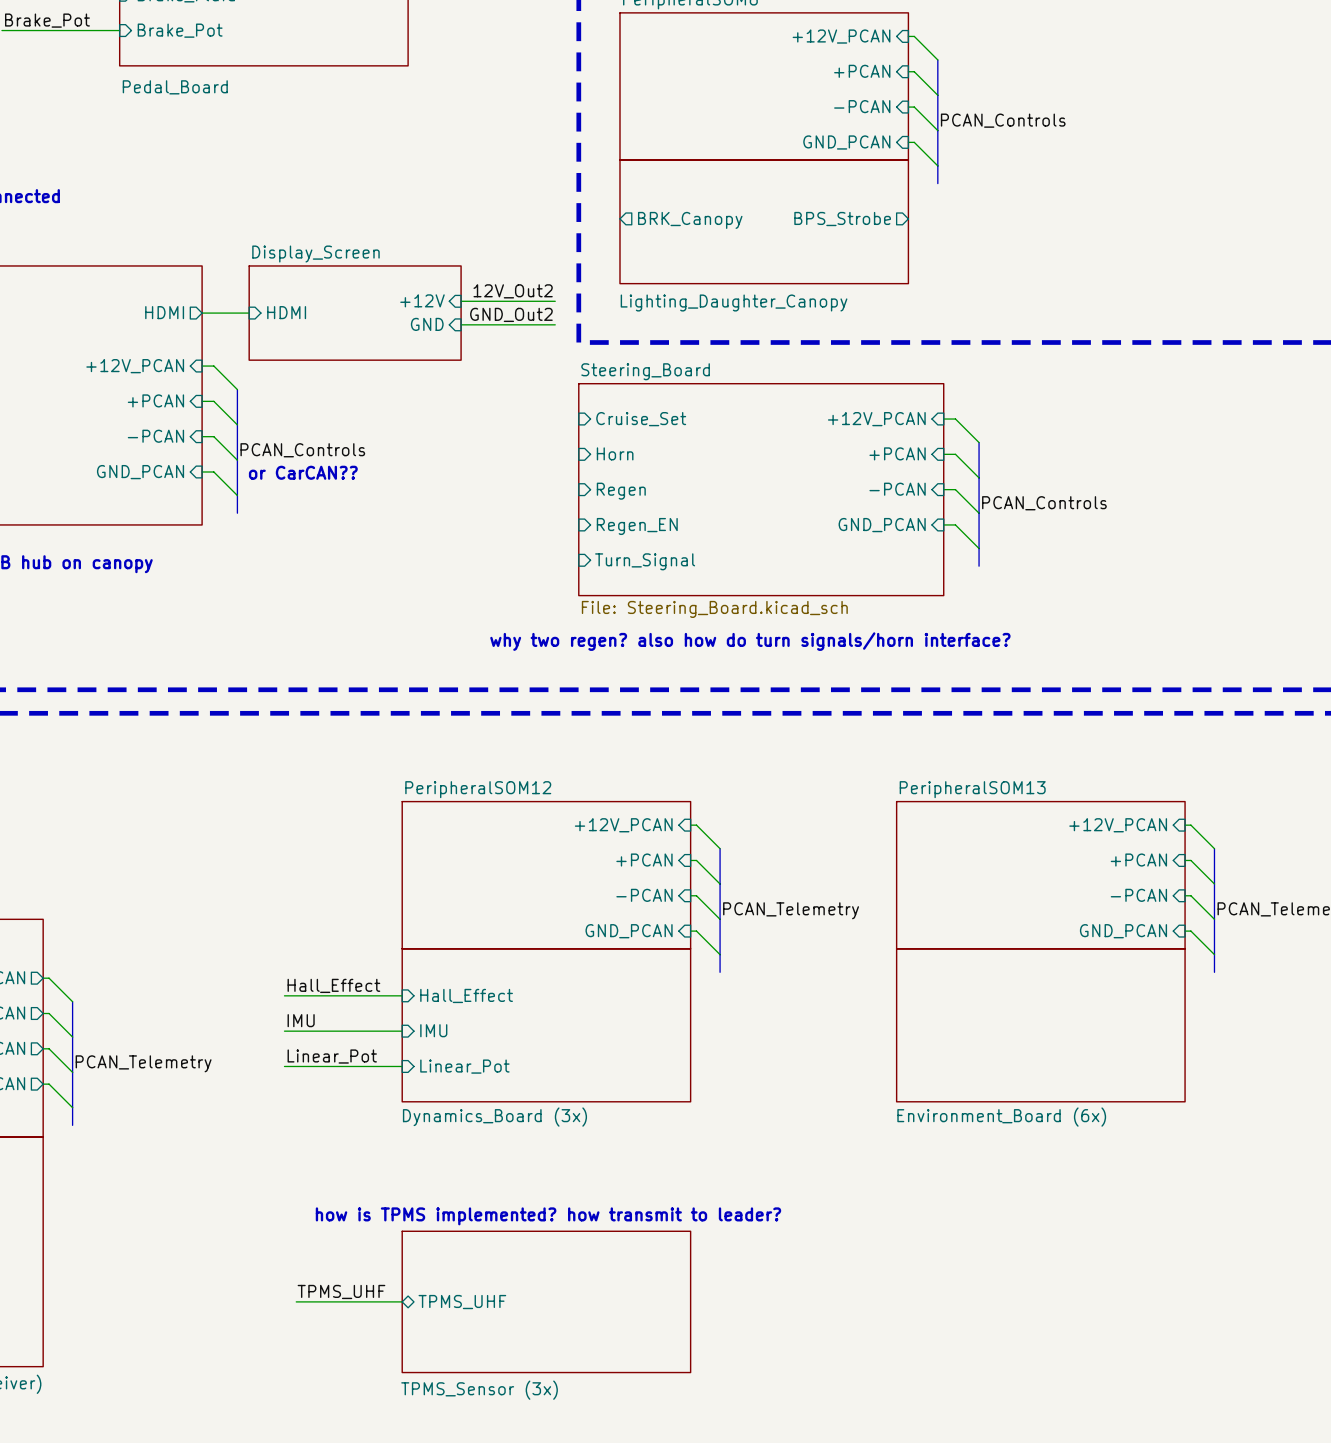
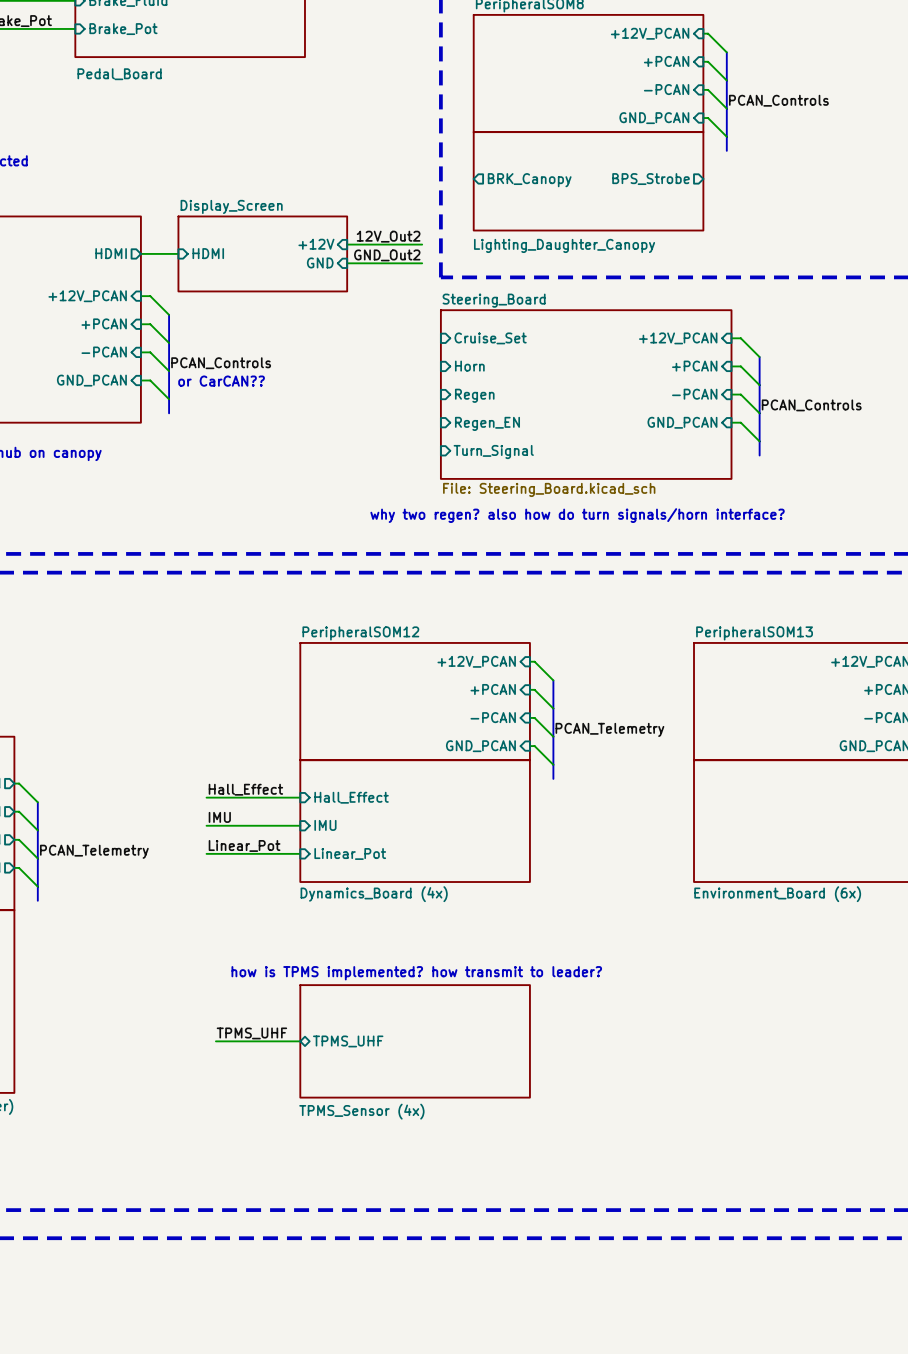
sheet Dynamics_Board (3x) name: Dynamics_Board (3x) (494, 1117) -> Dynamics_Board (4x) (374, 894)
sheet TPMS_Sensor (3x) name: TPMS_Sensor (3x) (479, 1390) -> TPMS_Sensor (4x) (361, 1111)

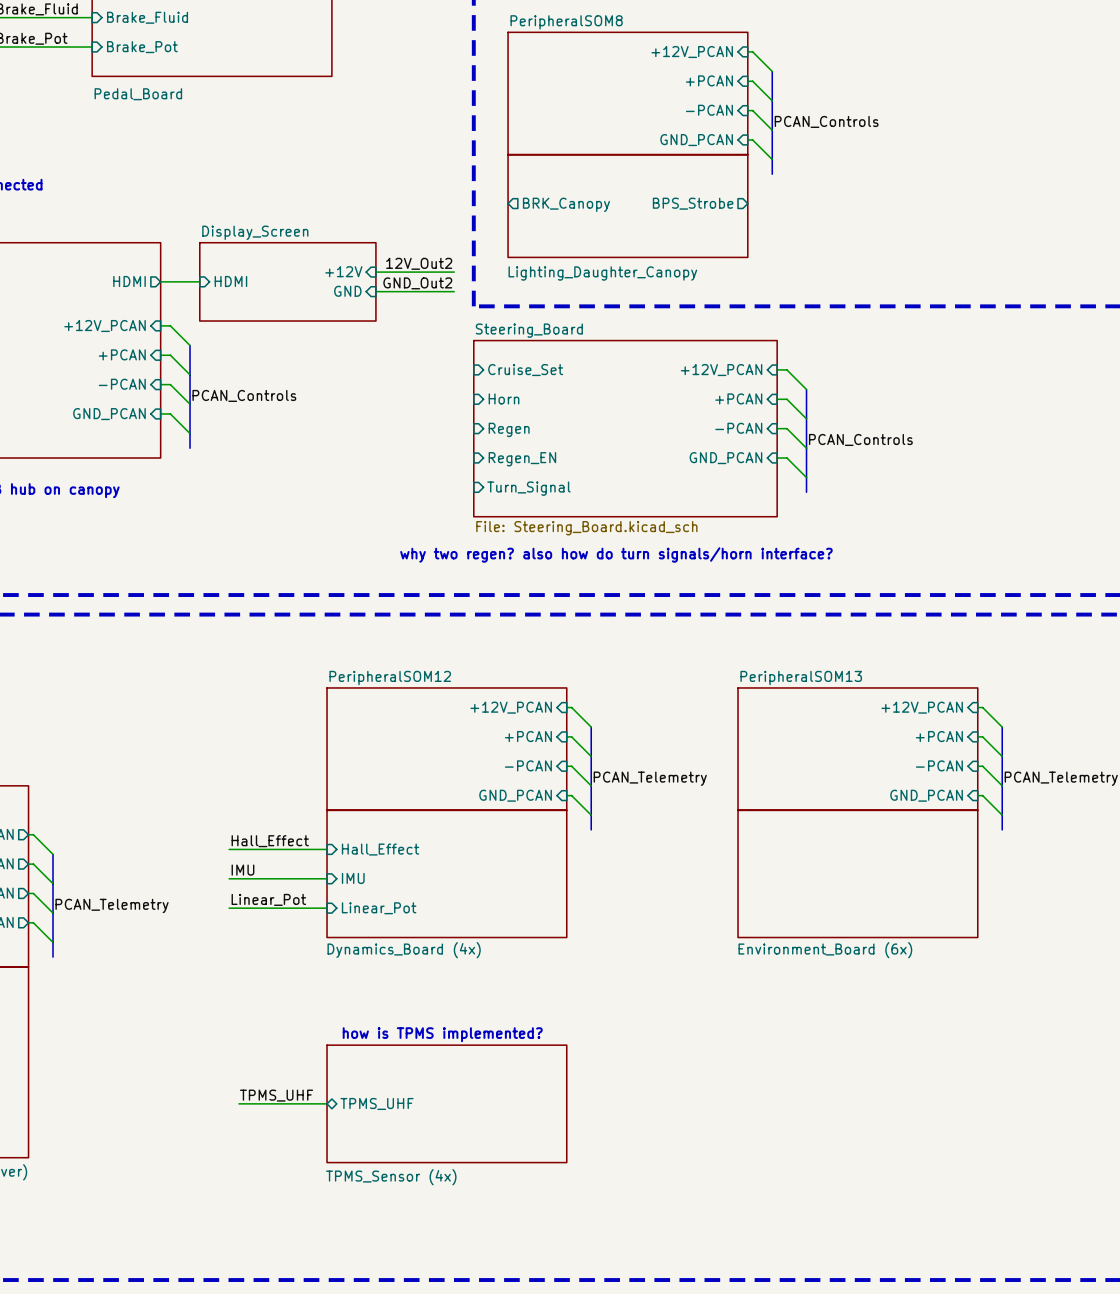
text: or CarCAN?? (221, 381) -> none
text: how is TPMS implemented? how transmit to leader? (416, 973) -> how is TPMS implemented? (442, 1034)

